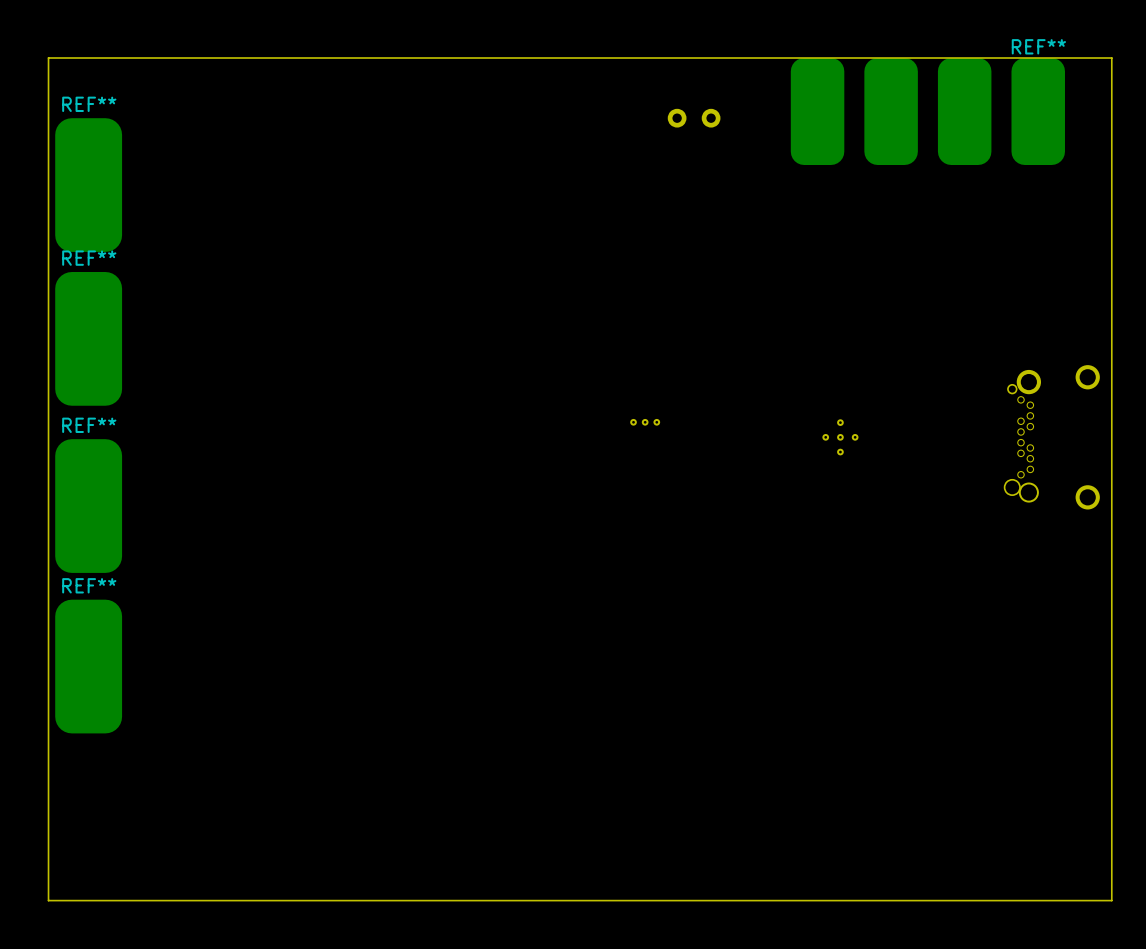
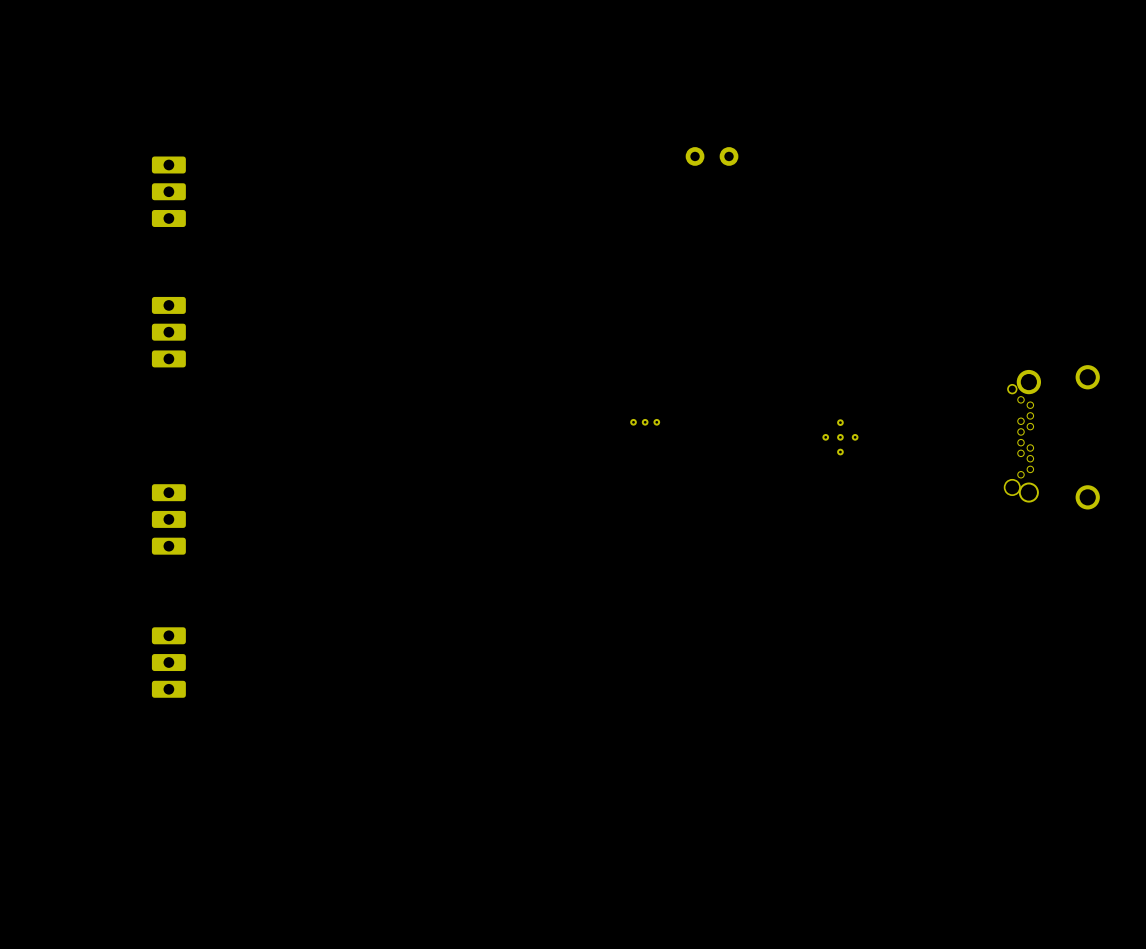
board edge: (1111, 58) (48, 58) (48, 900) (1111, 900) (1111, 58) -> none
part: (817, 111) -> none
part: (891, 111) -> none
part: (964, 111) -> none
REF**: (1038, 111) -> none
part position: (694, 118) -> (712, 156)
REF**: (88, 185) -> none
part: none -> (168, 191)
part: none -> (168, 332)
REF**: (88, 338) -> none
REF**: (88, 506) -> none
part: none -> (168, 519)
part: none -> (168, 662)
REF**: (88, 666) -> none

